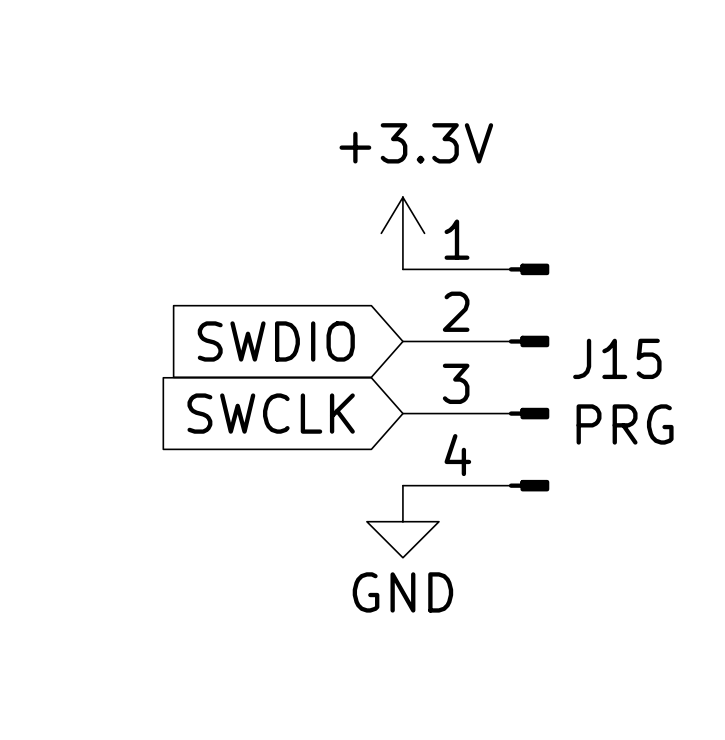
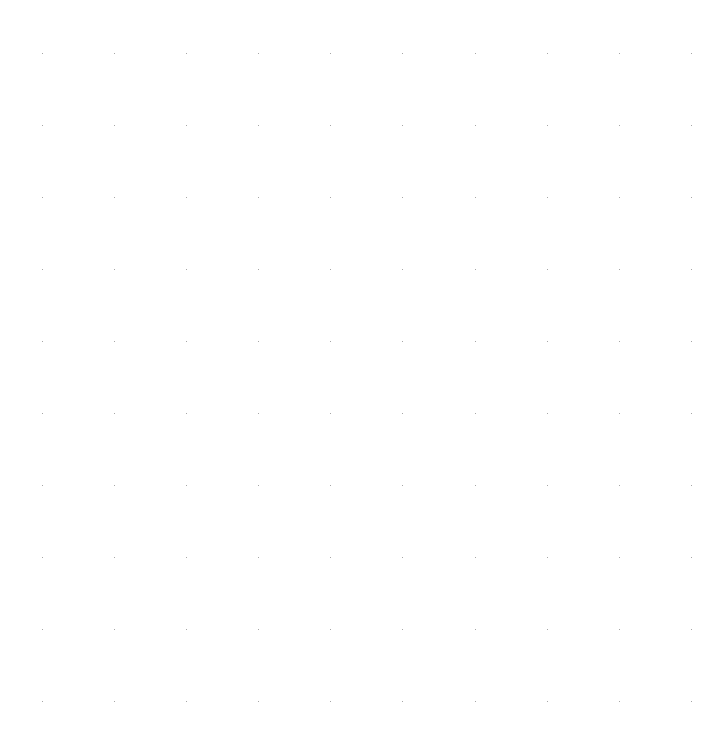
power symbol: +3.3V (402, 233) -> none
global label: SWDIO (276, 341) -> none
J15: PRG (476, 377) -> none
global label: SWCLK (271, 413) -> none
power symbol: GND (402, 521) -> none

